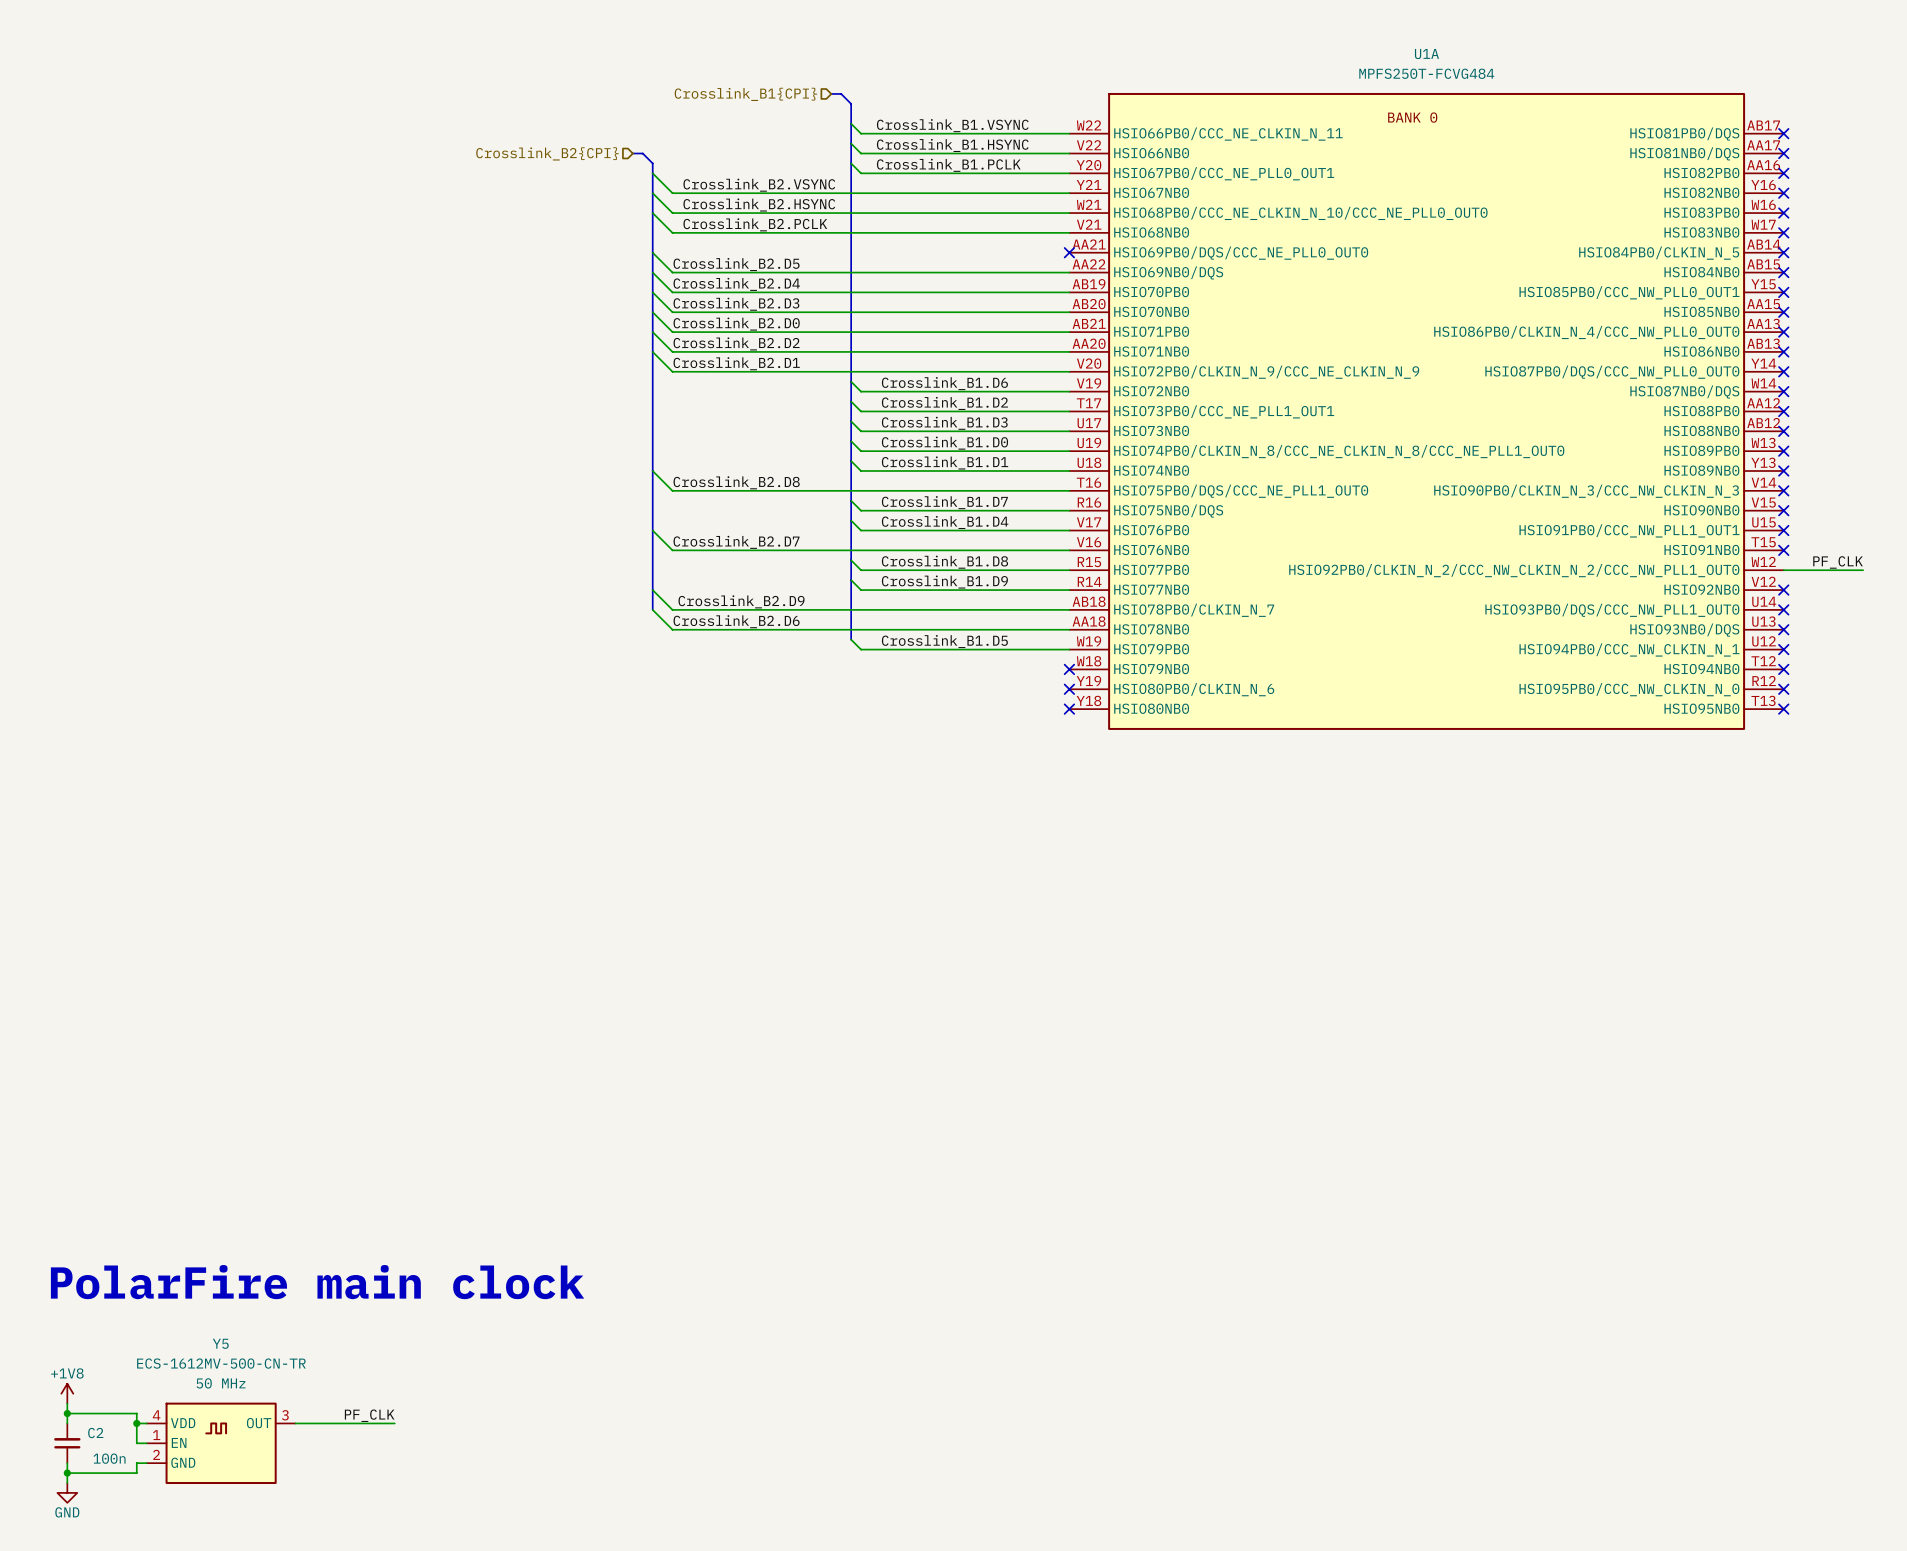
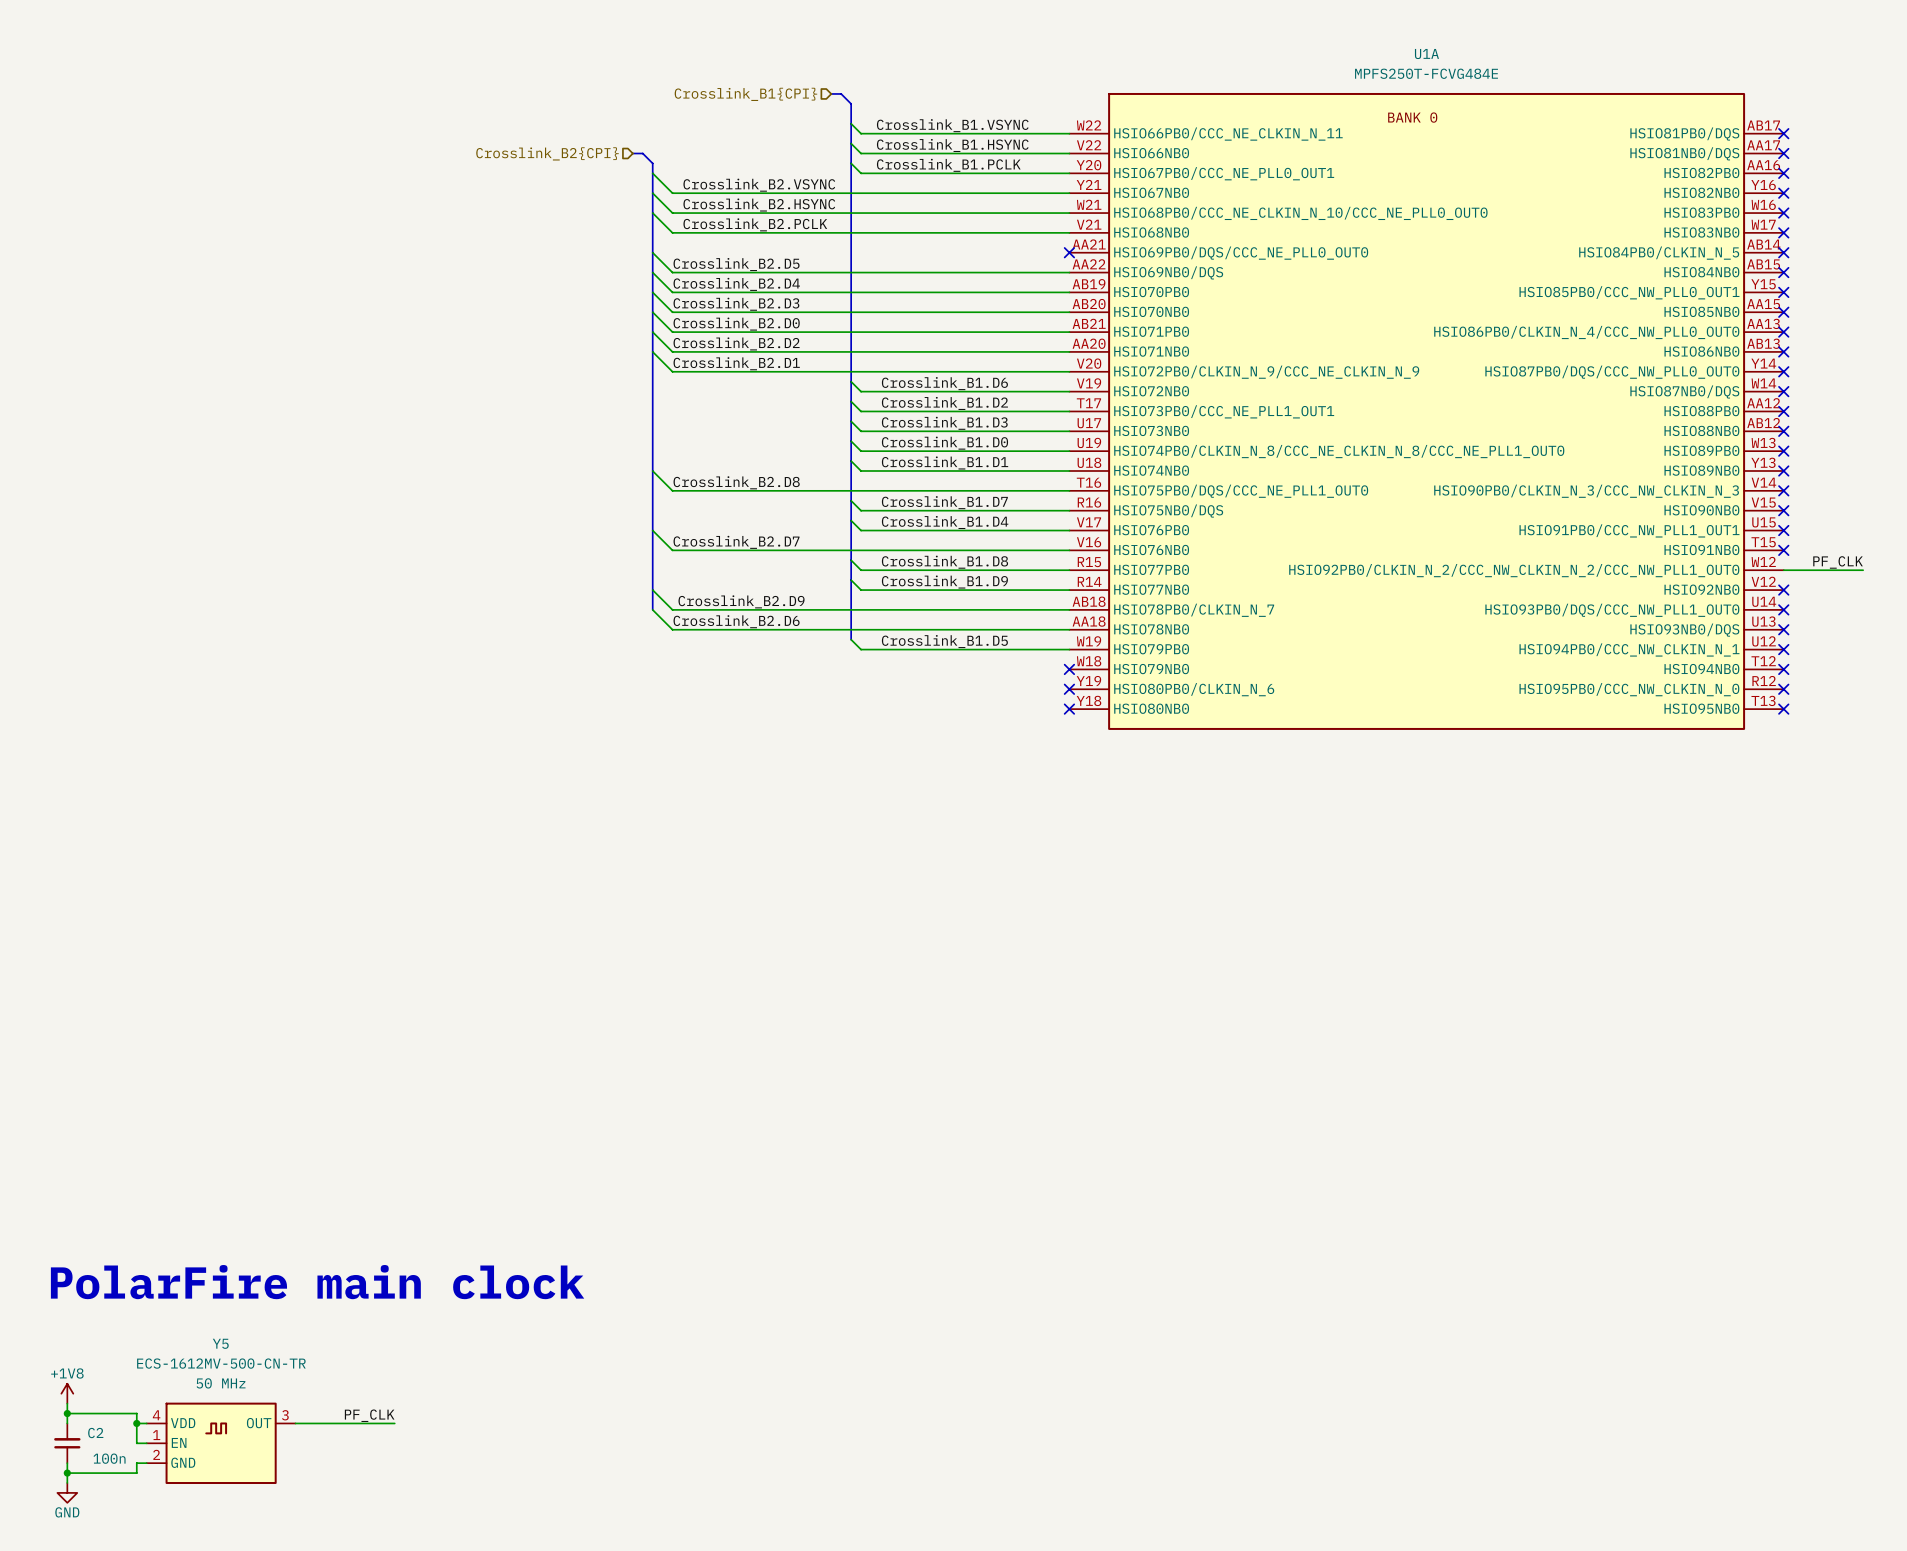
U1A text: MPFS250T-FCVG484 (1426, 73) -> MPFS250T-FCVG484E (1426, 73)

